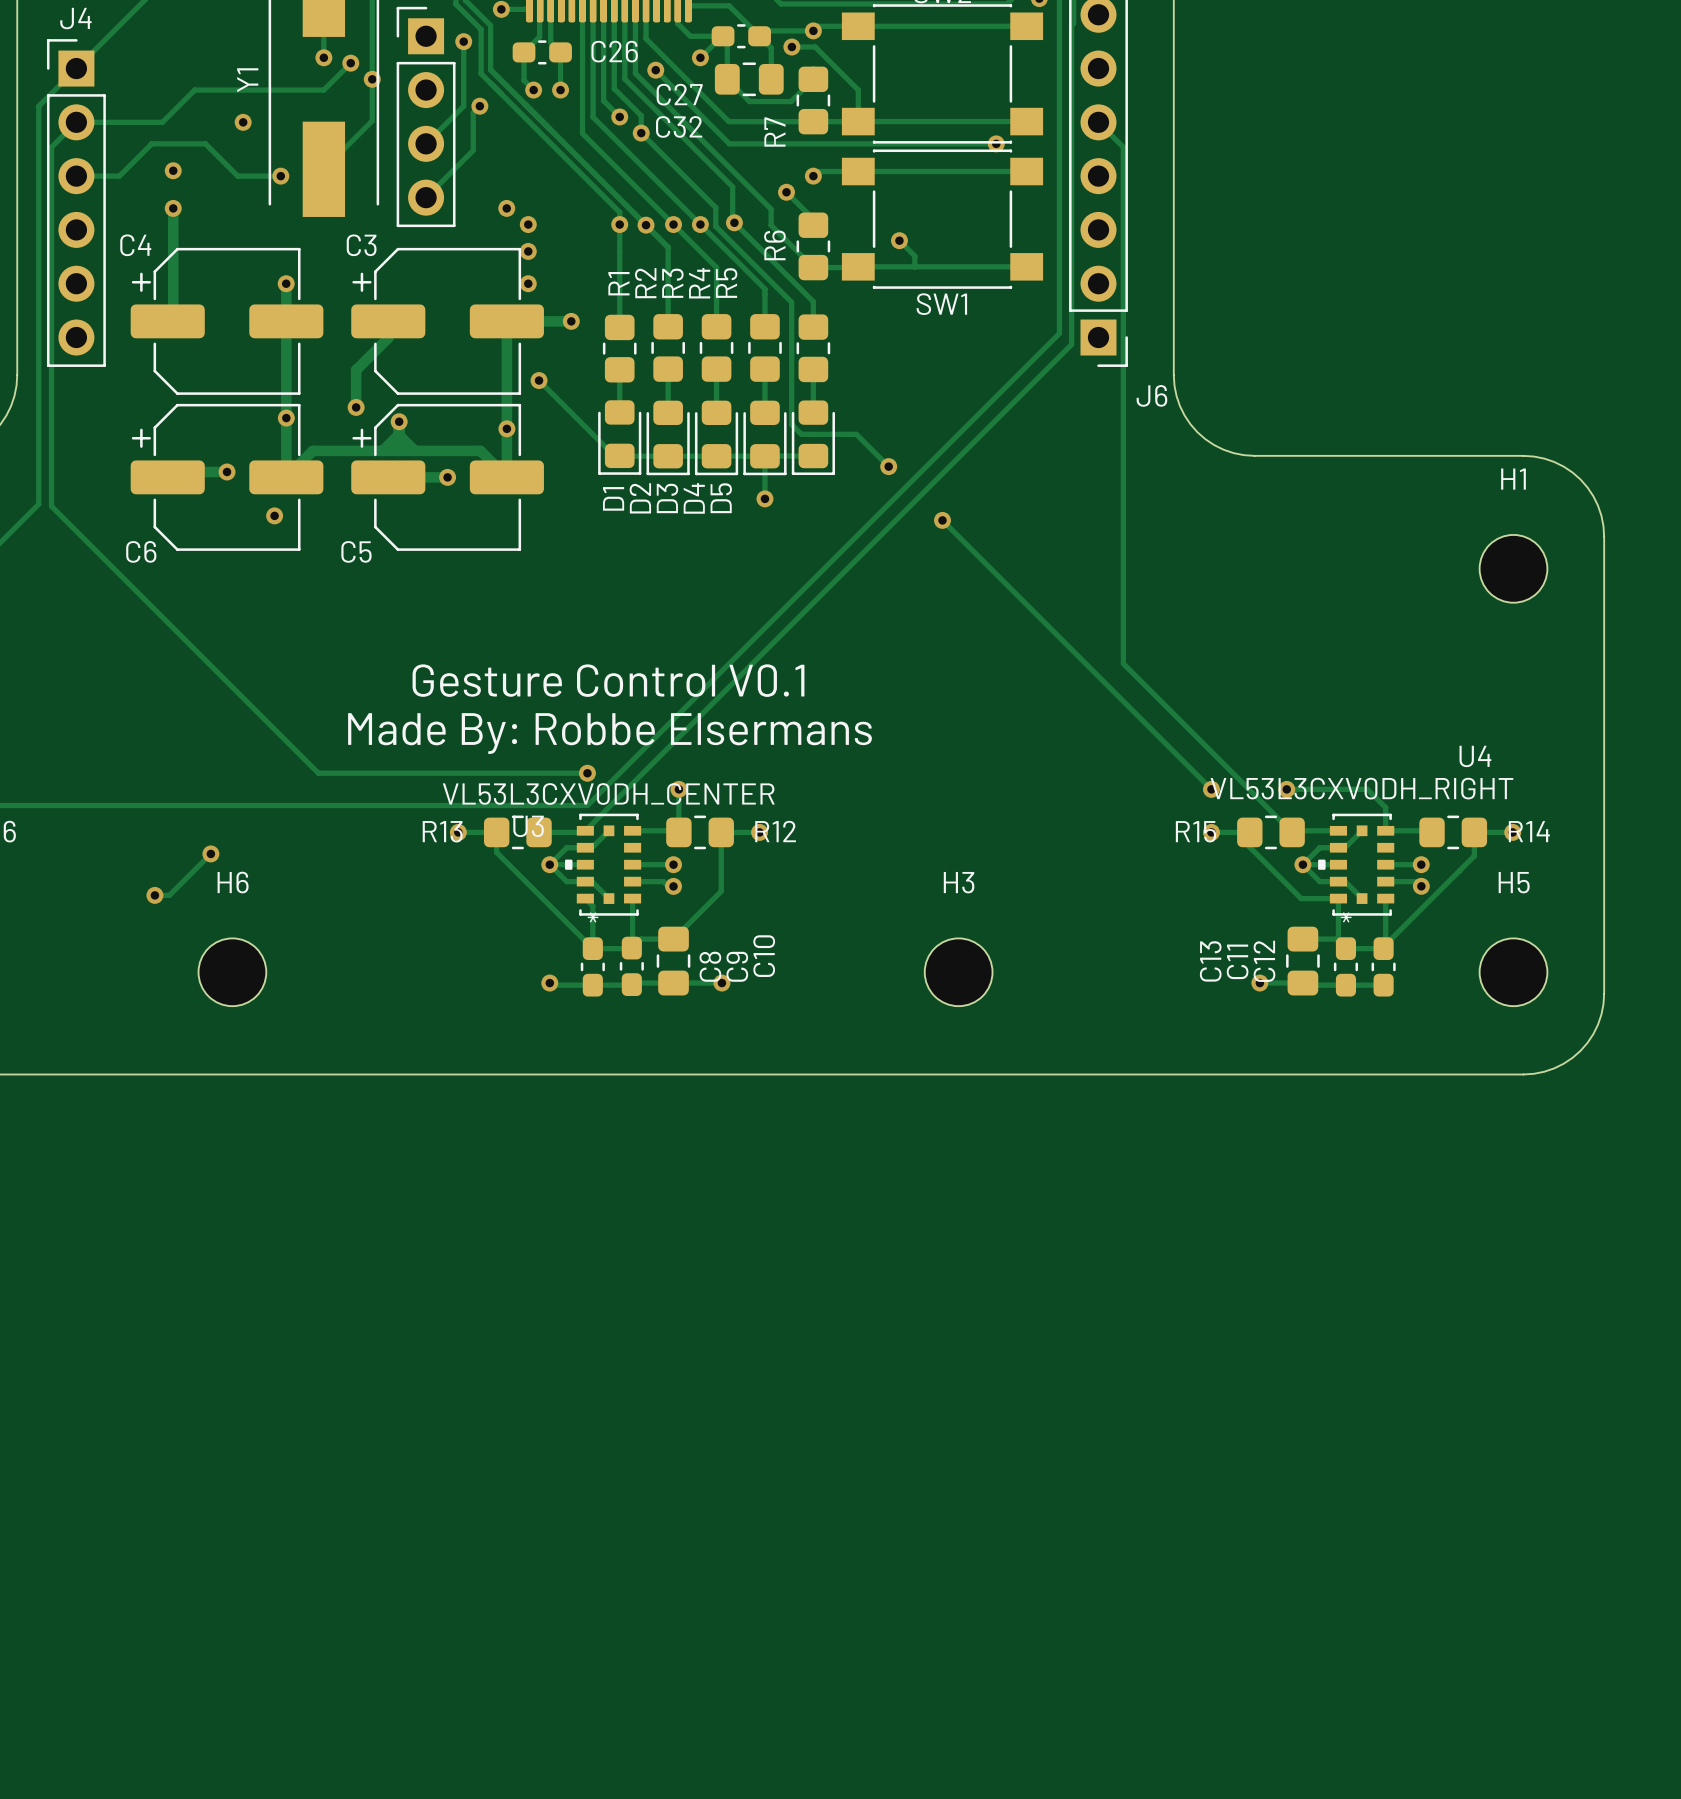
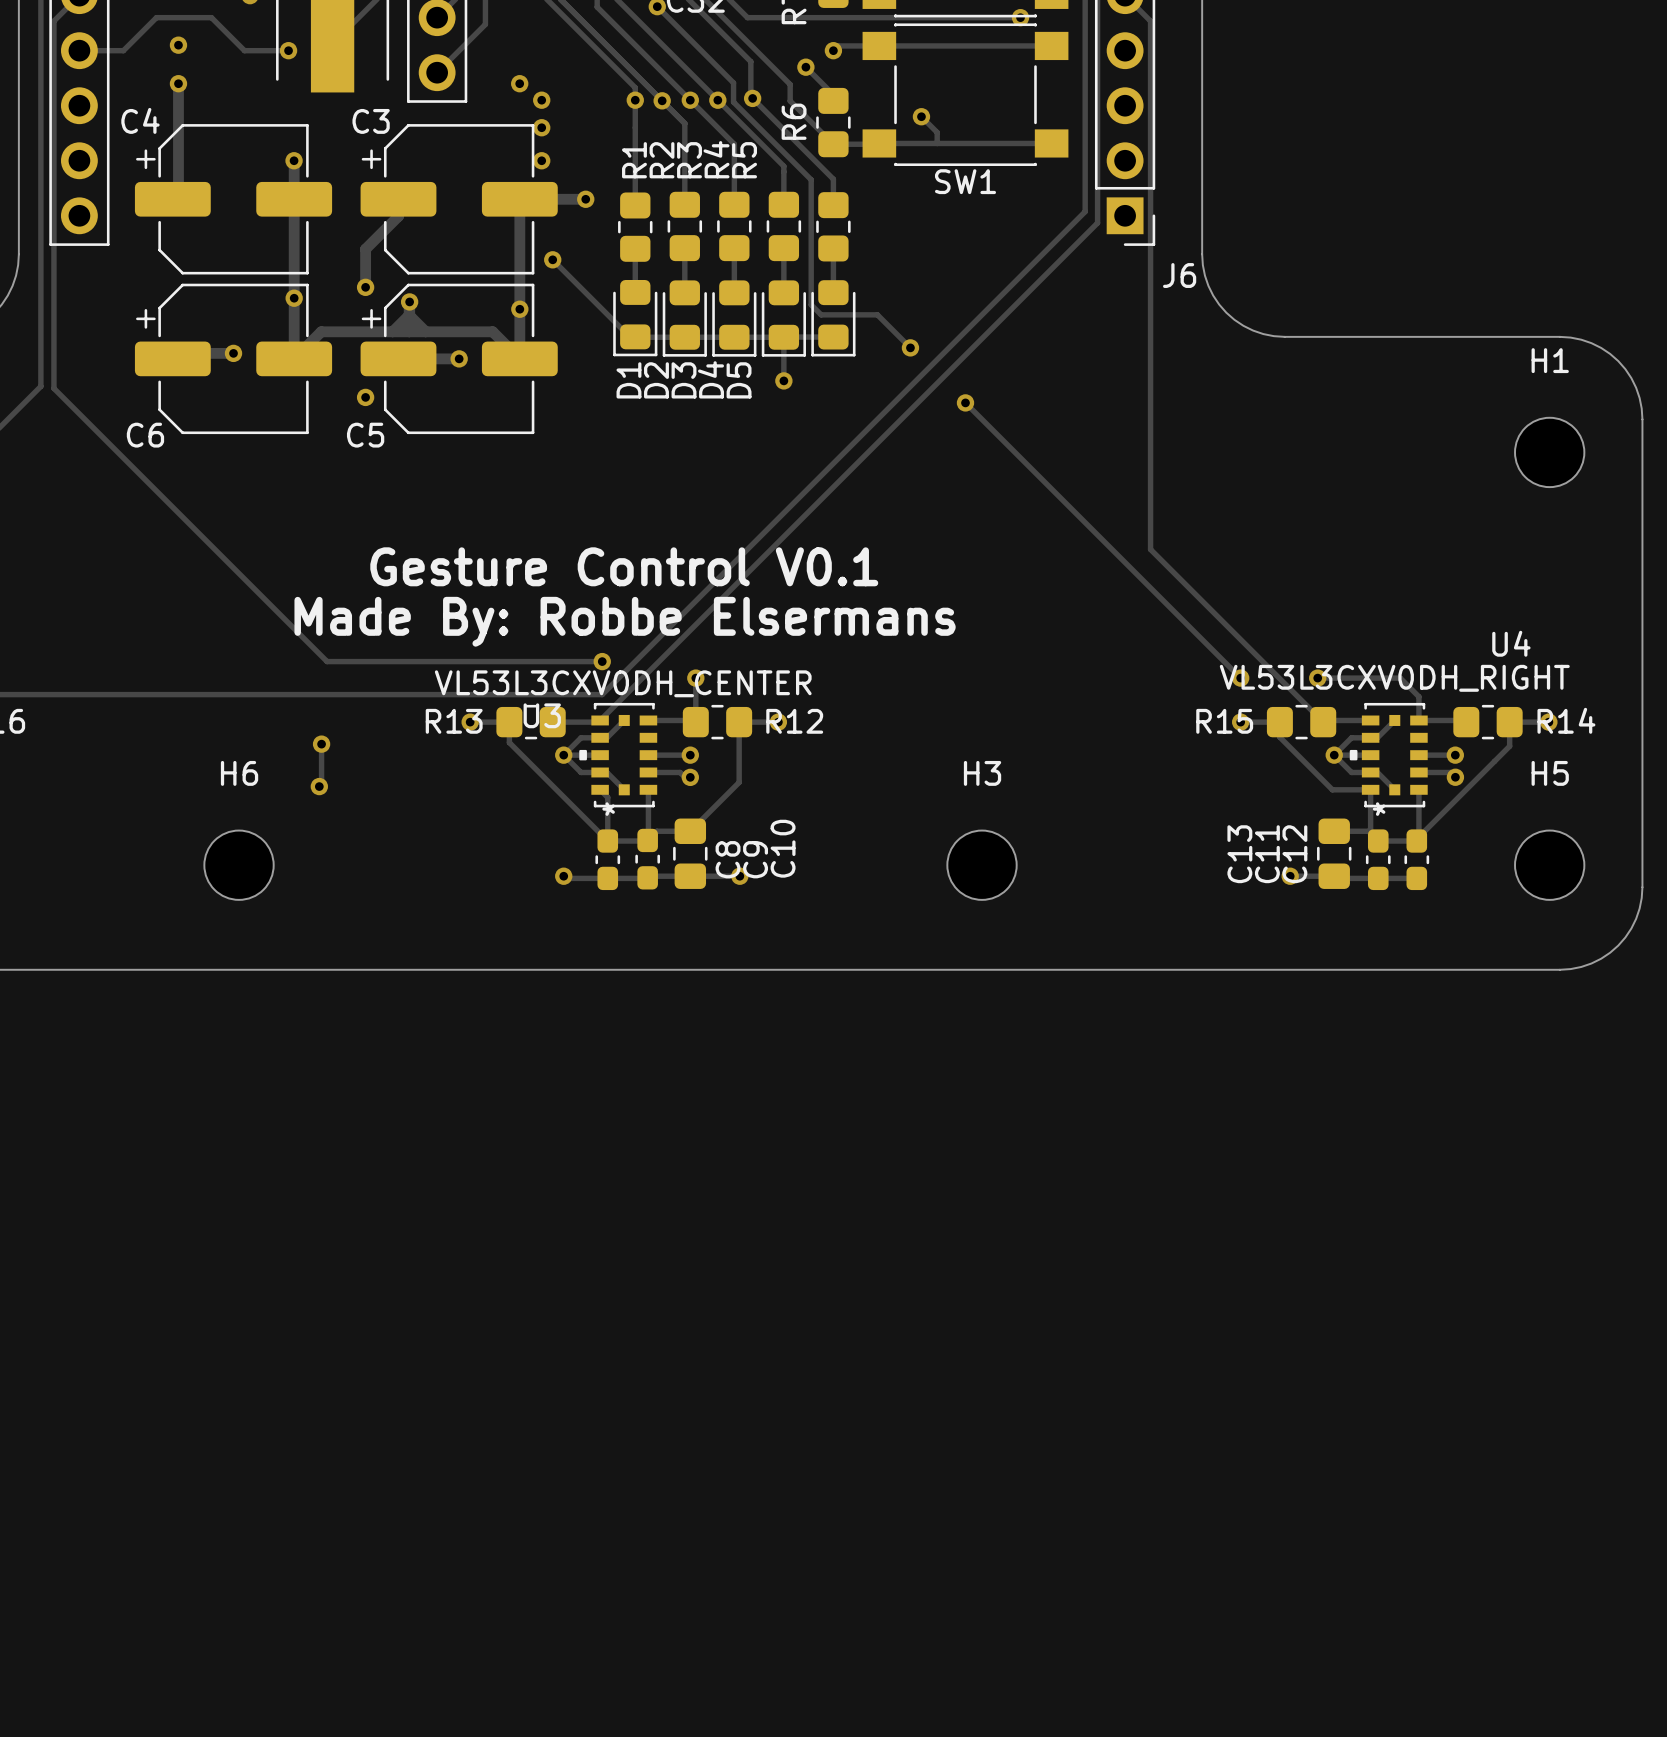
via position: (274, 515) -> (365, 397)
track: (210, 853) (169, 895) (154, 895) -> none
via: (210, 853) -> none
track: none -> (321, 744) (321, 784) (319, 786)
via: none -> (321, 744)
via: (154, 895) -> none
via: none -> (319, 786)

